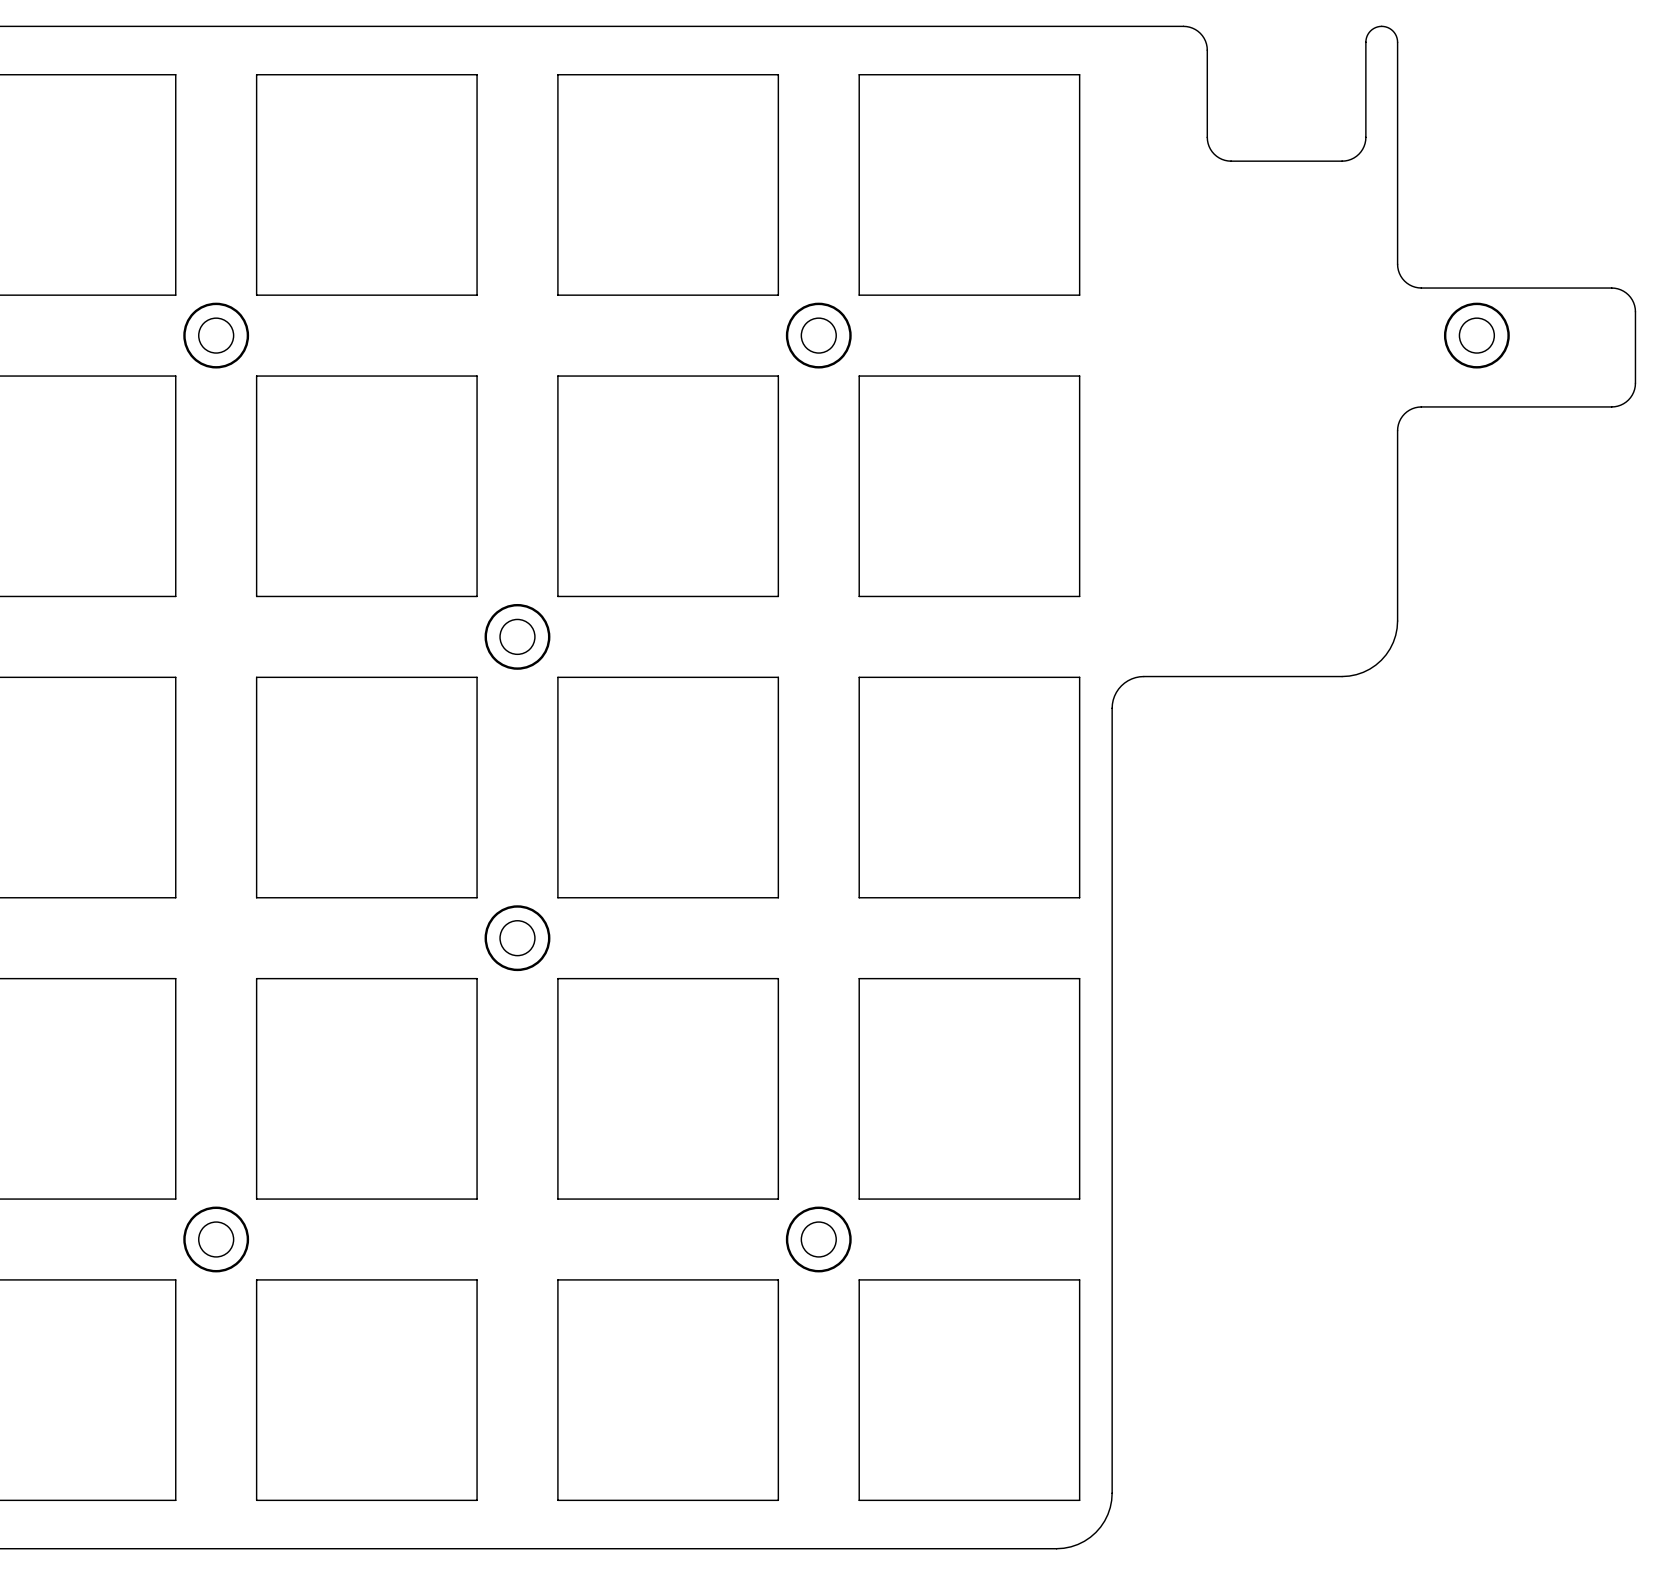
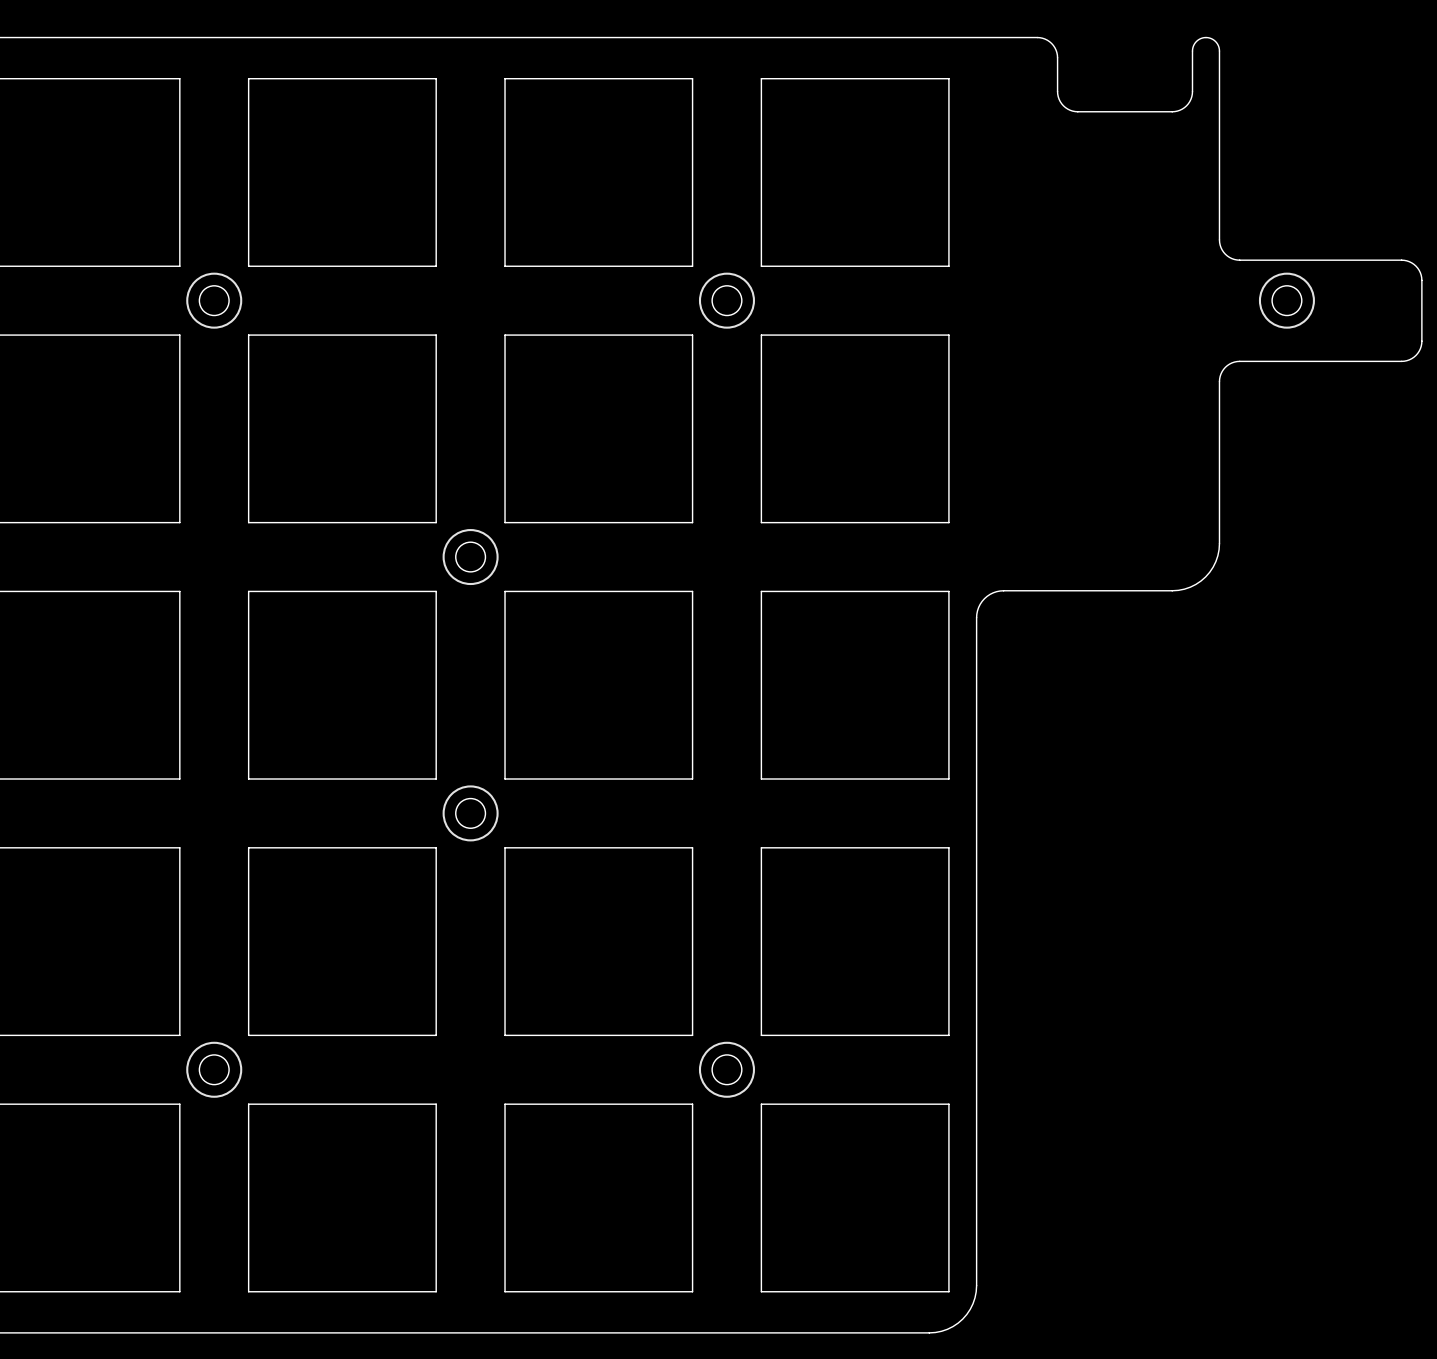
board edge: (1207, 89) (1208, 143) (1216, 156) (1231, 161) (1342, 161) (1353, 157) (1362, 149) (1365, 140) (1365, 89) -> (1057, 91) (1059, 99) (1063, 105) (1070, 110) (1077, 111) (1174, 111) (1186, 105) (1190, 99) (1192, 91)

